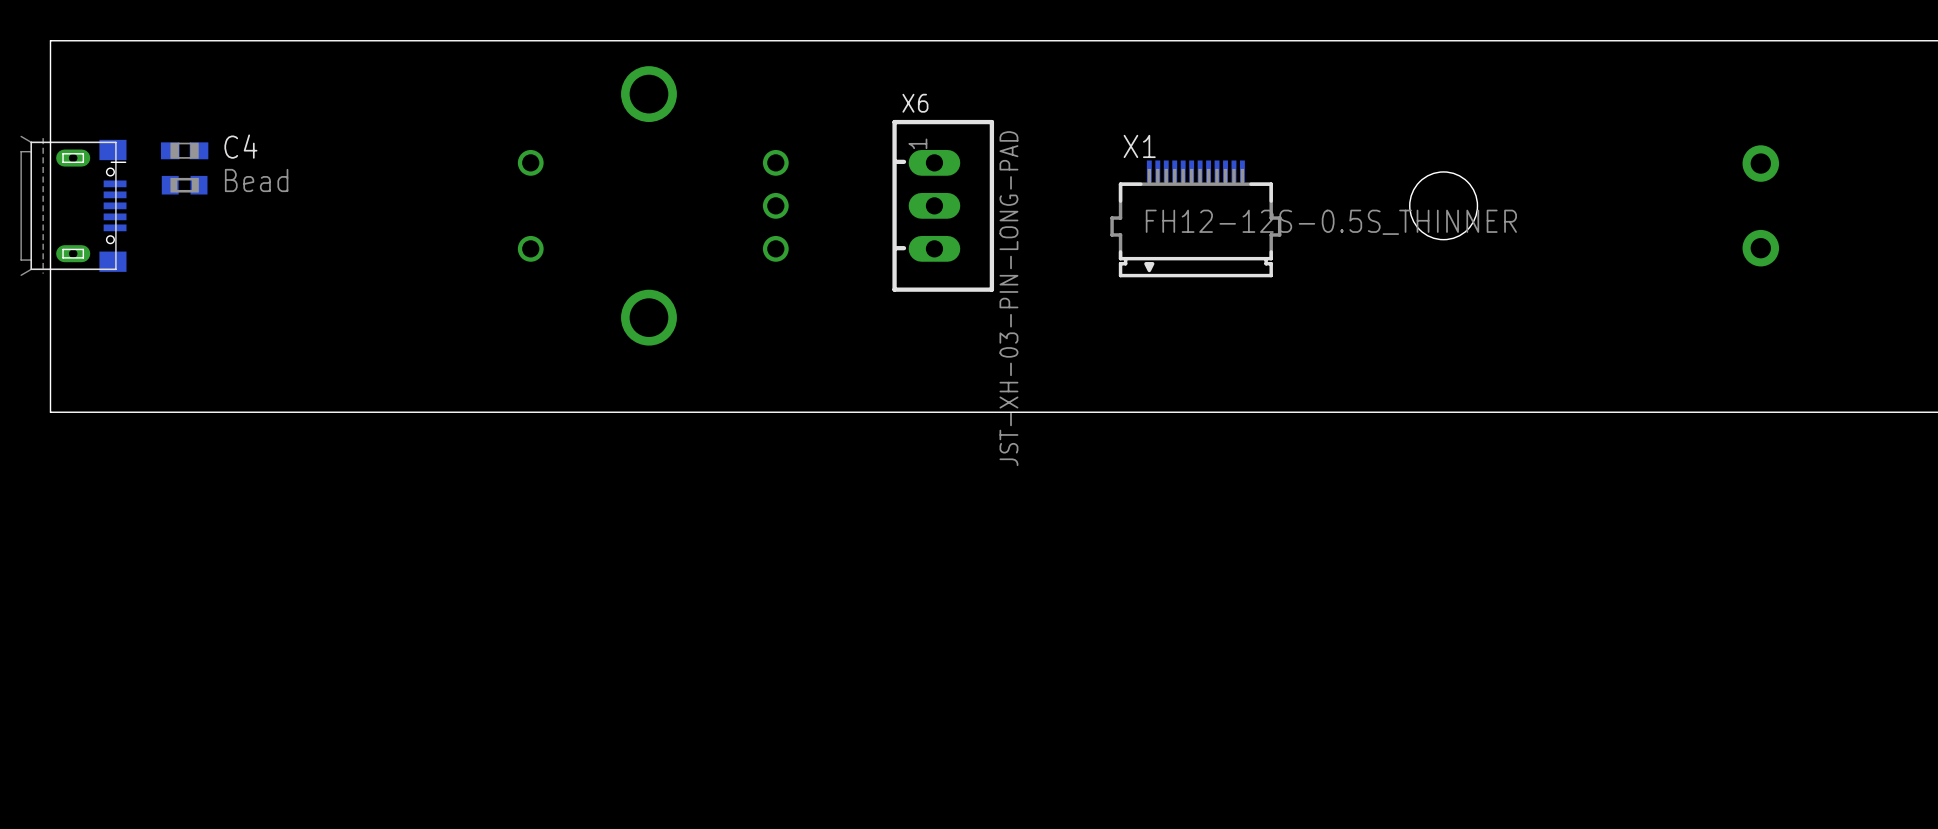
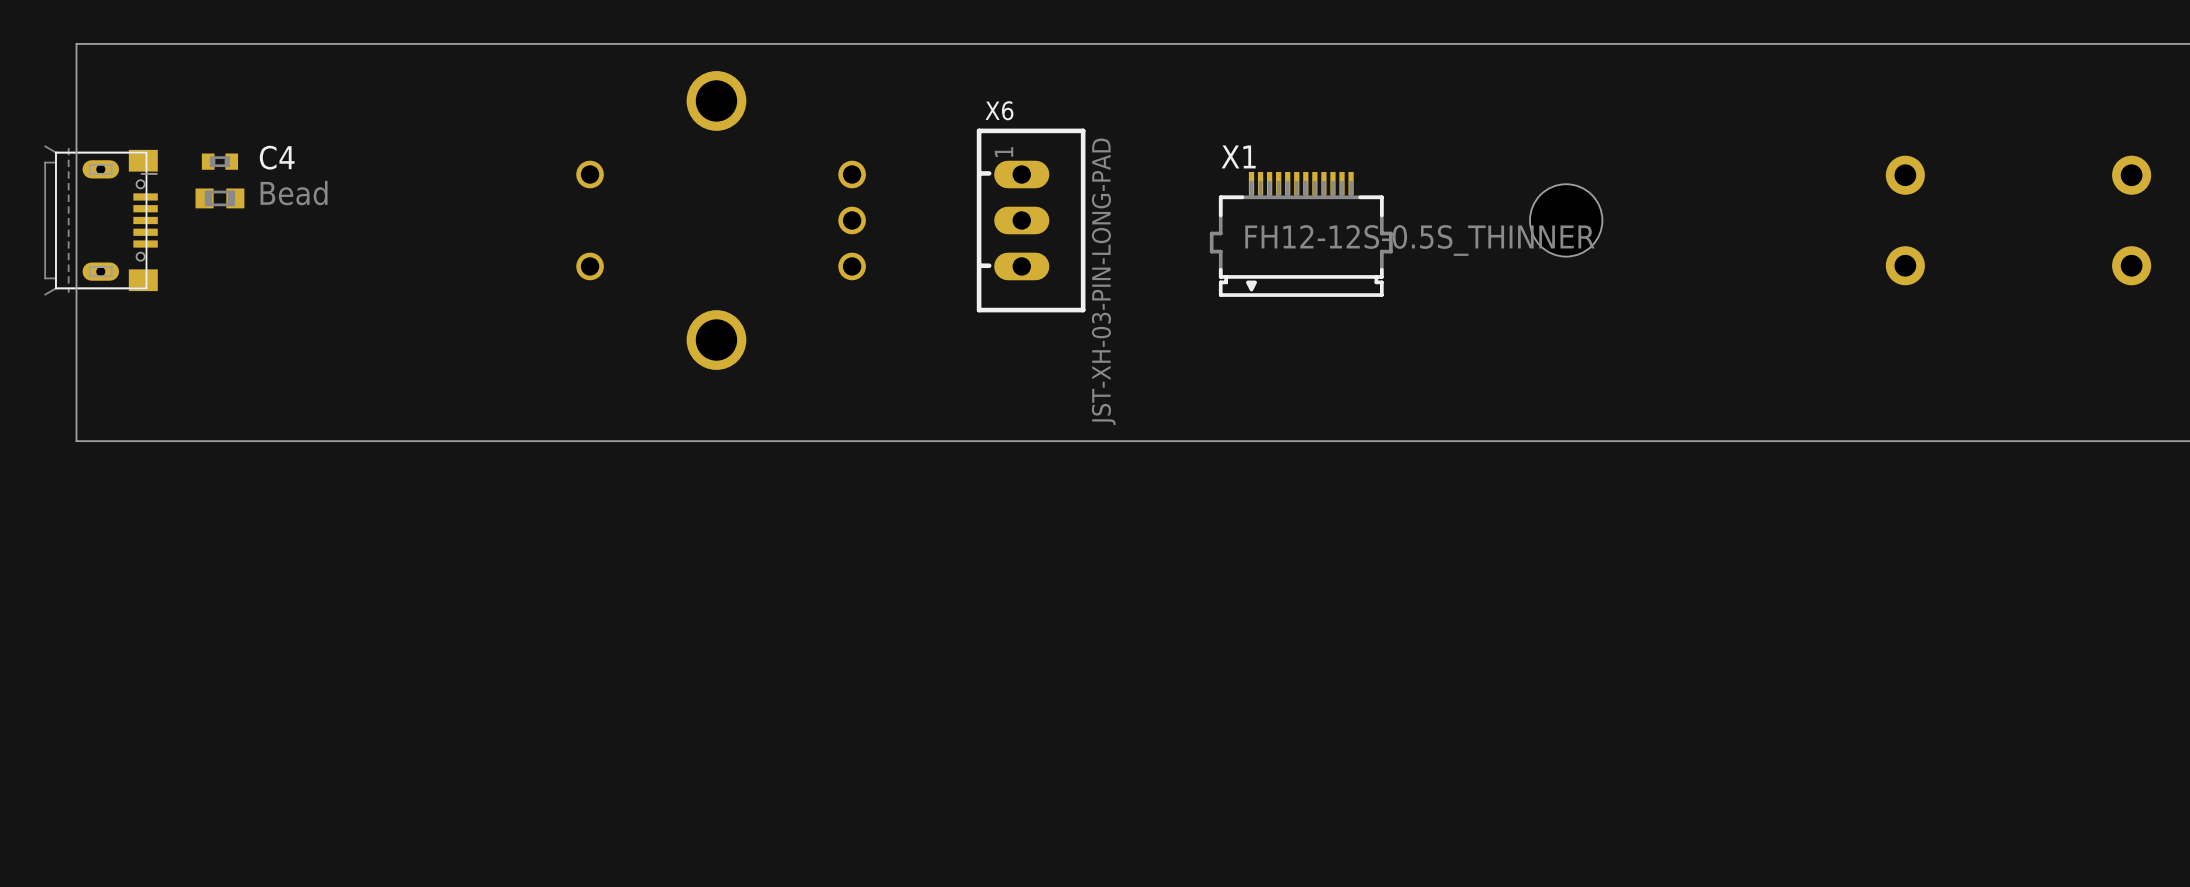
C4 footprint: [160, 142, 209, 160] -> [201, 153, 239, 170]

